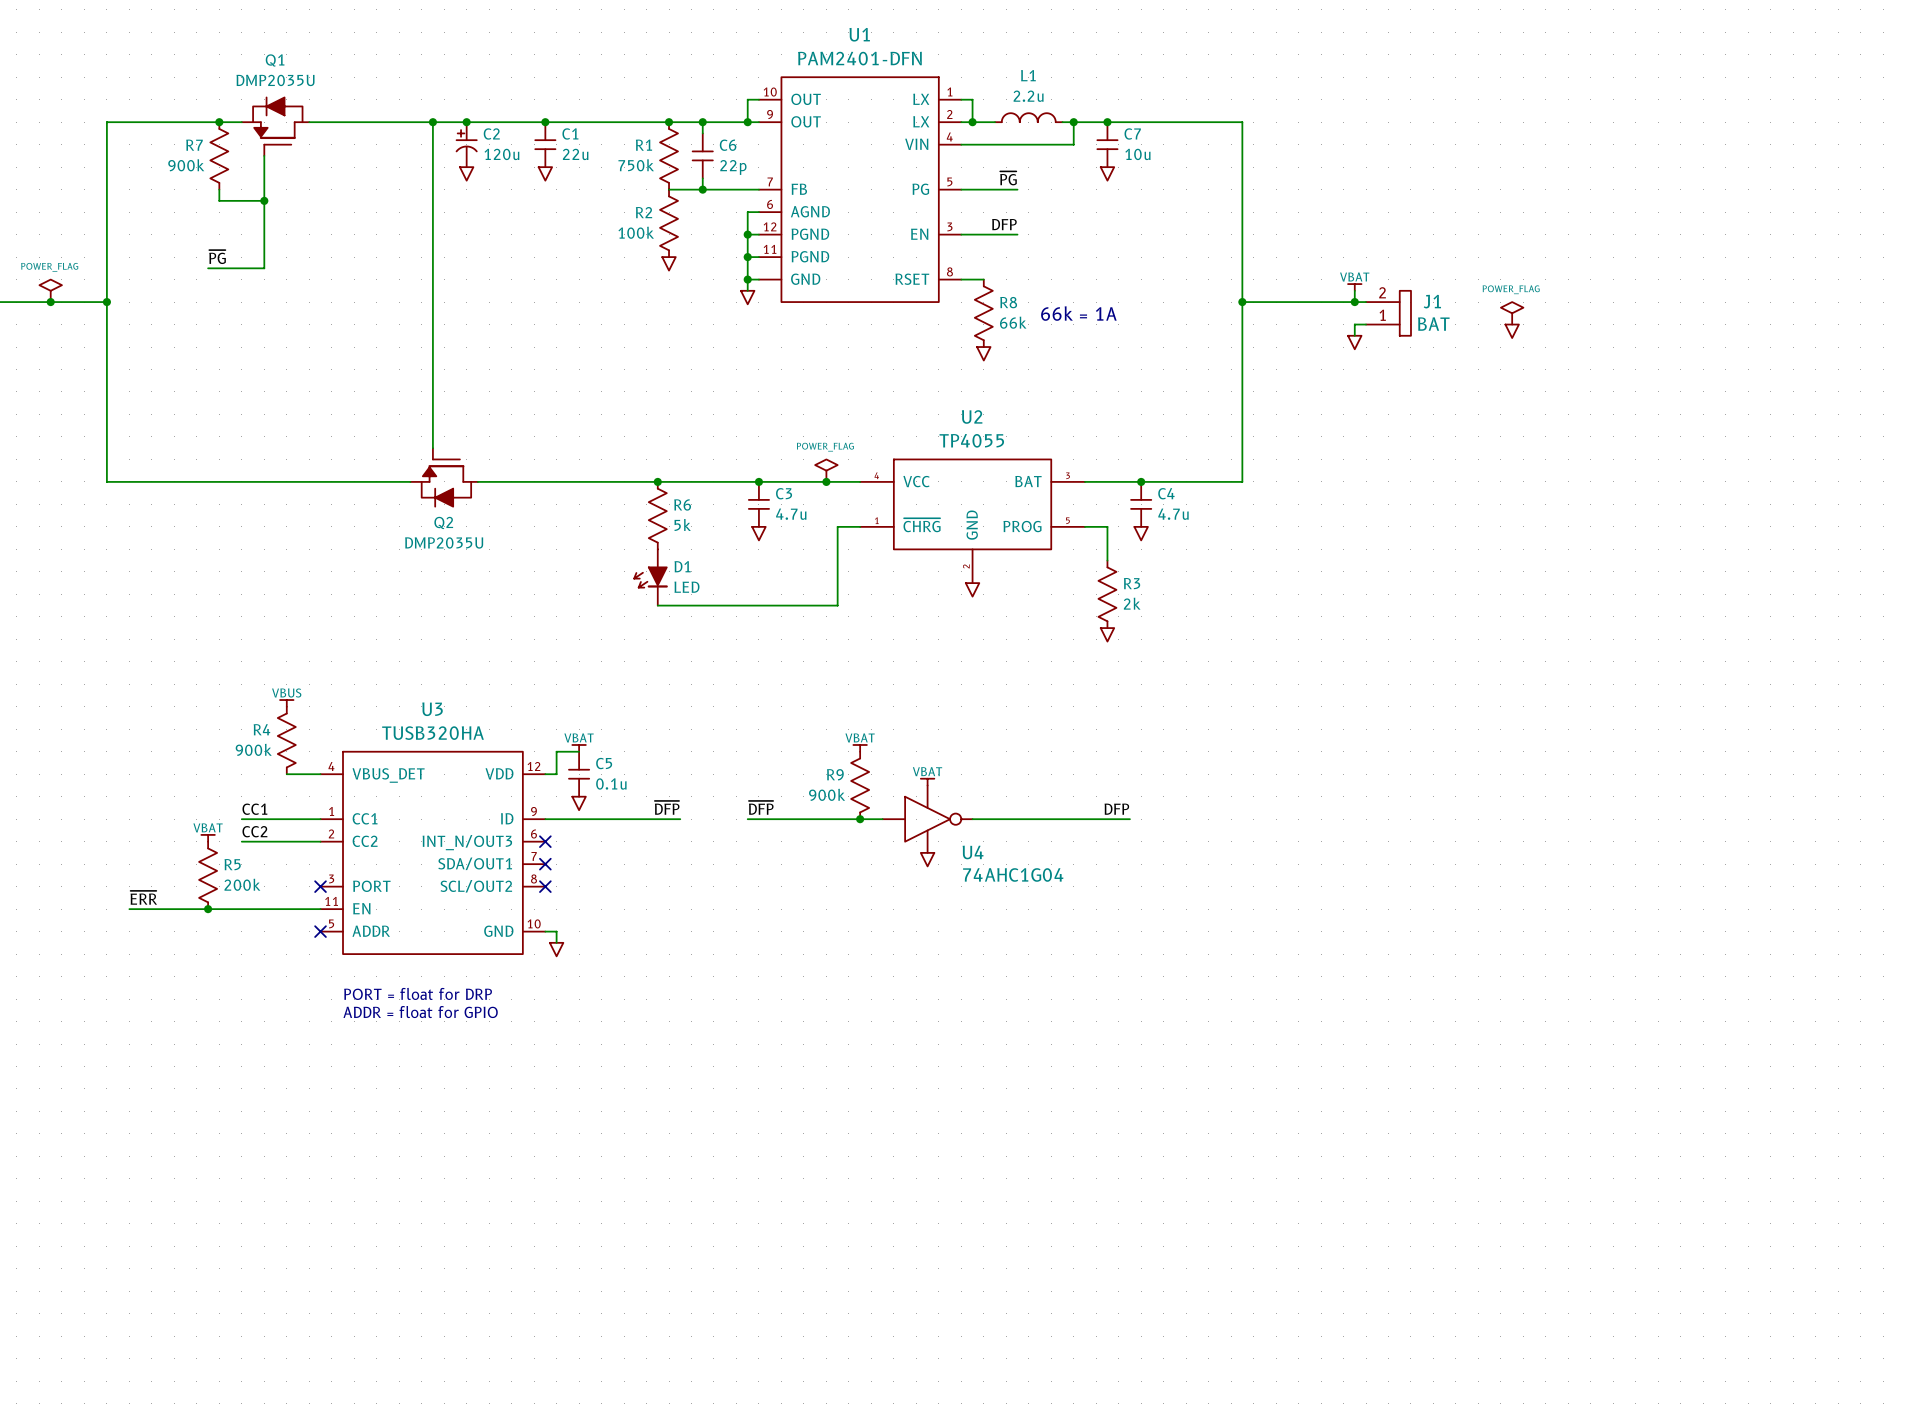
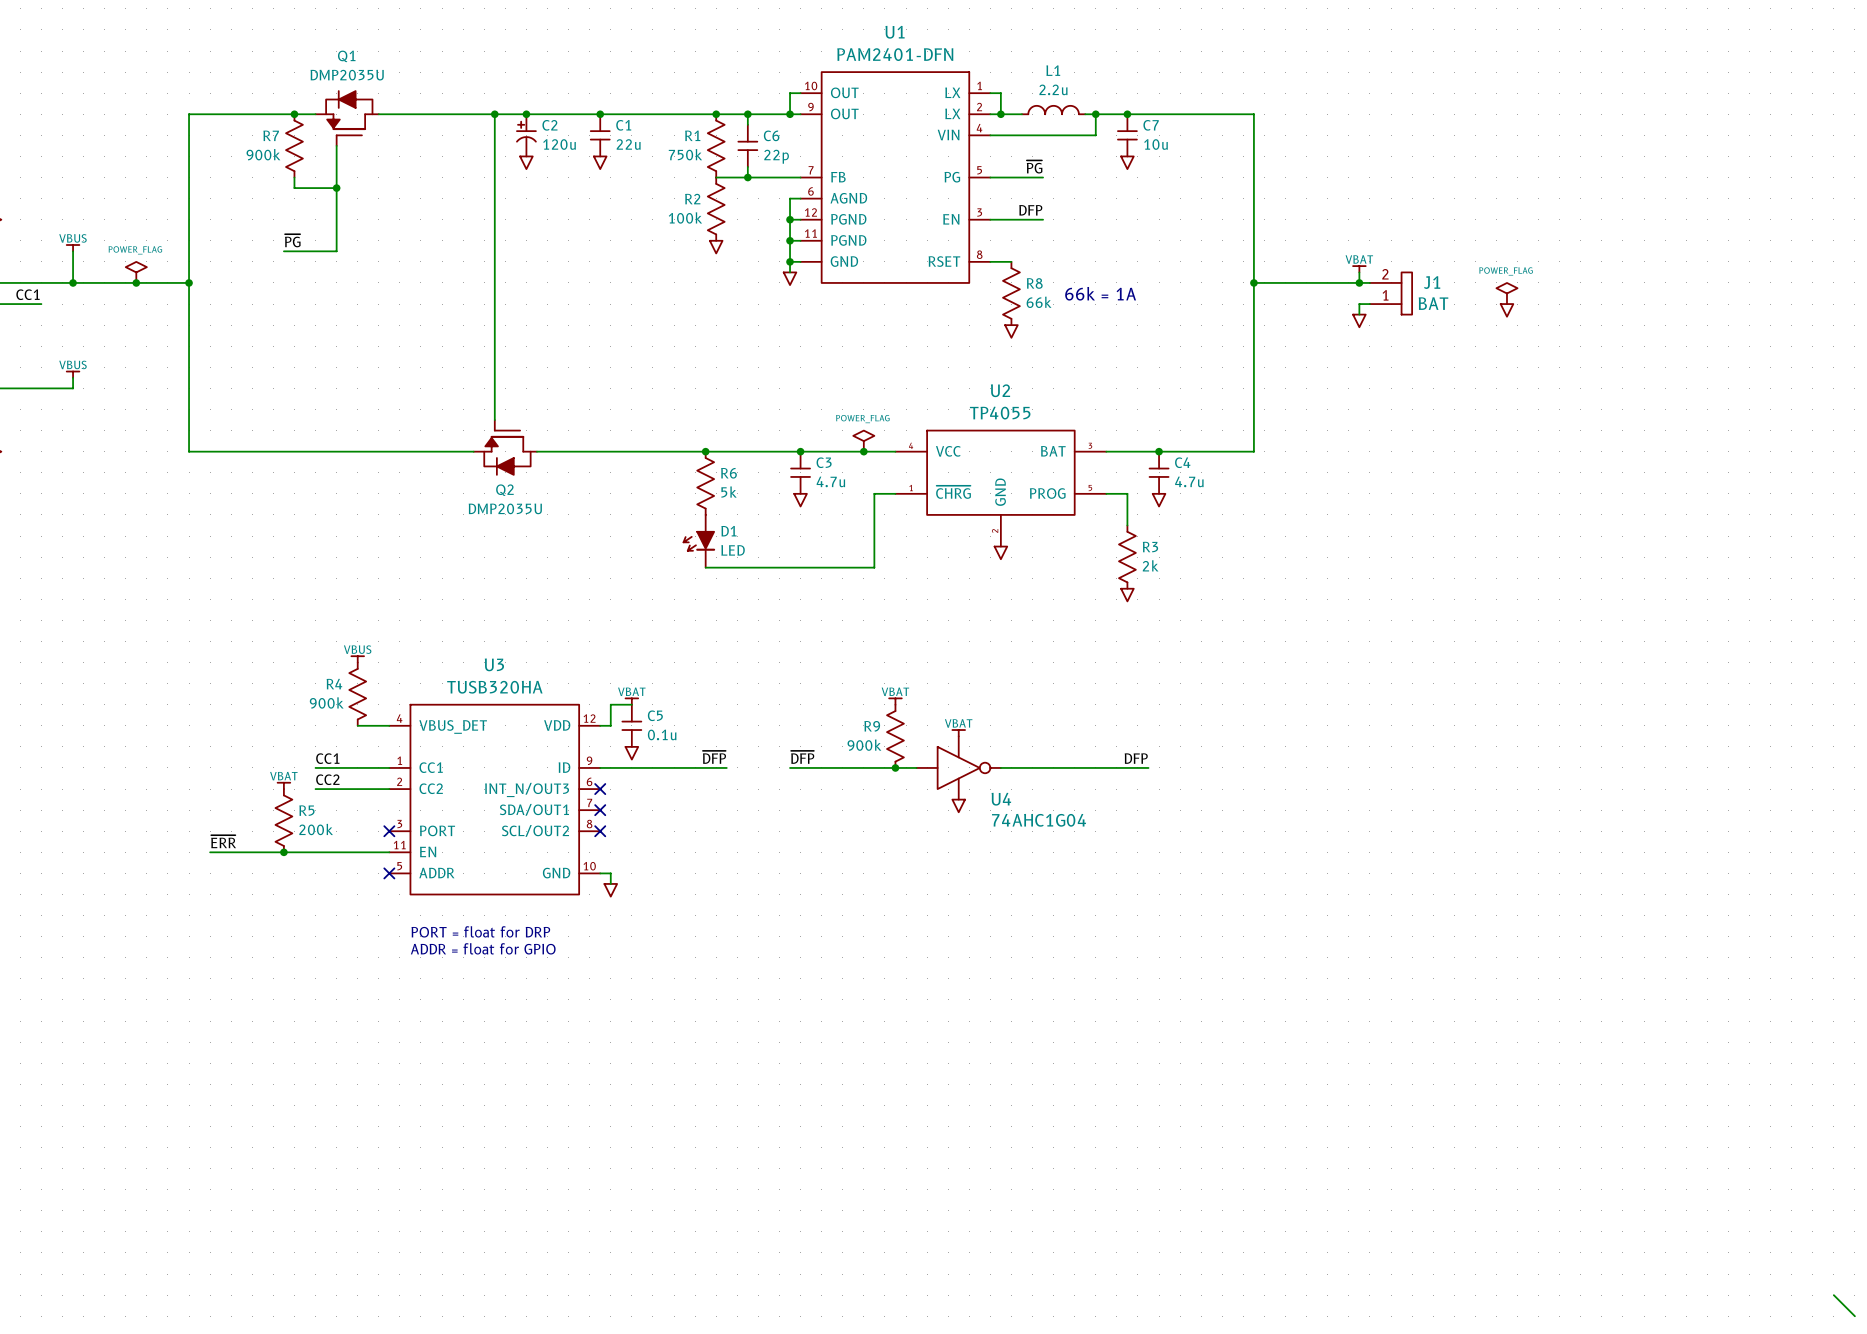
wire: none -> (1833, 1295) (1854, 1316)

